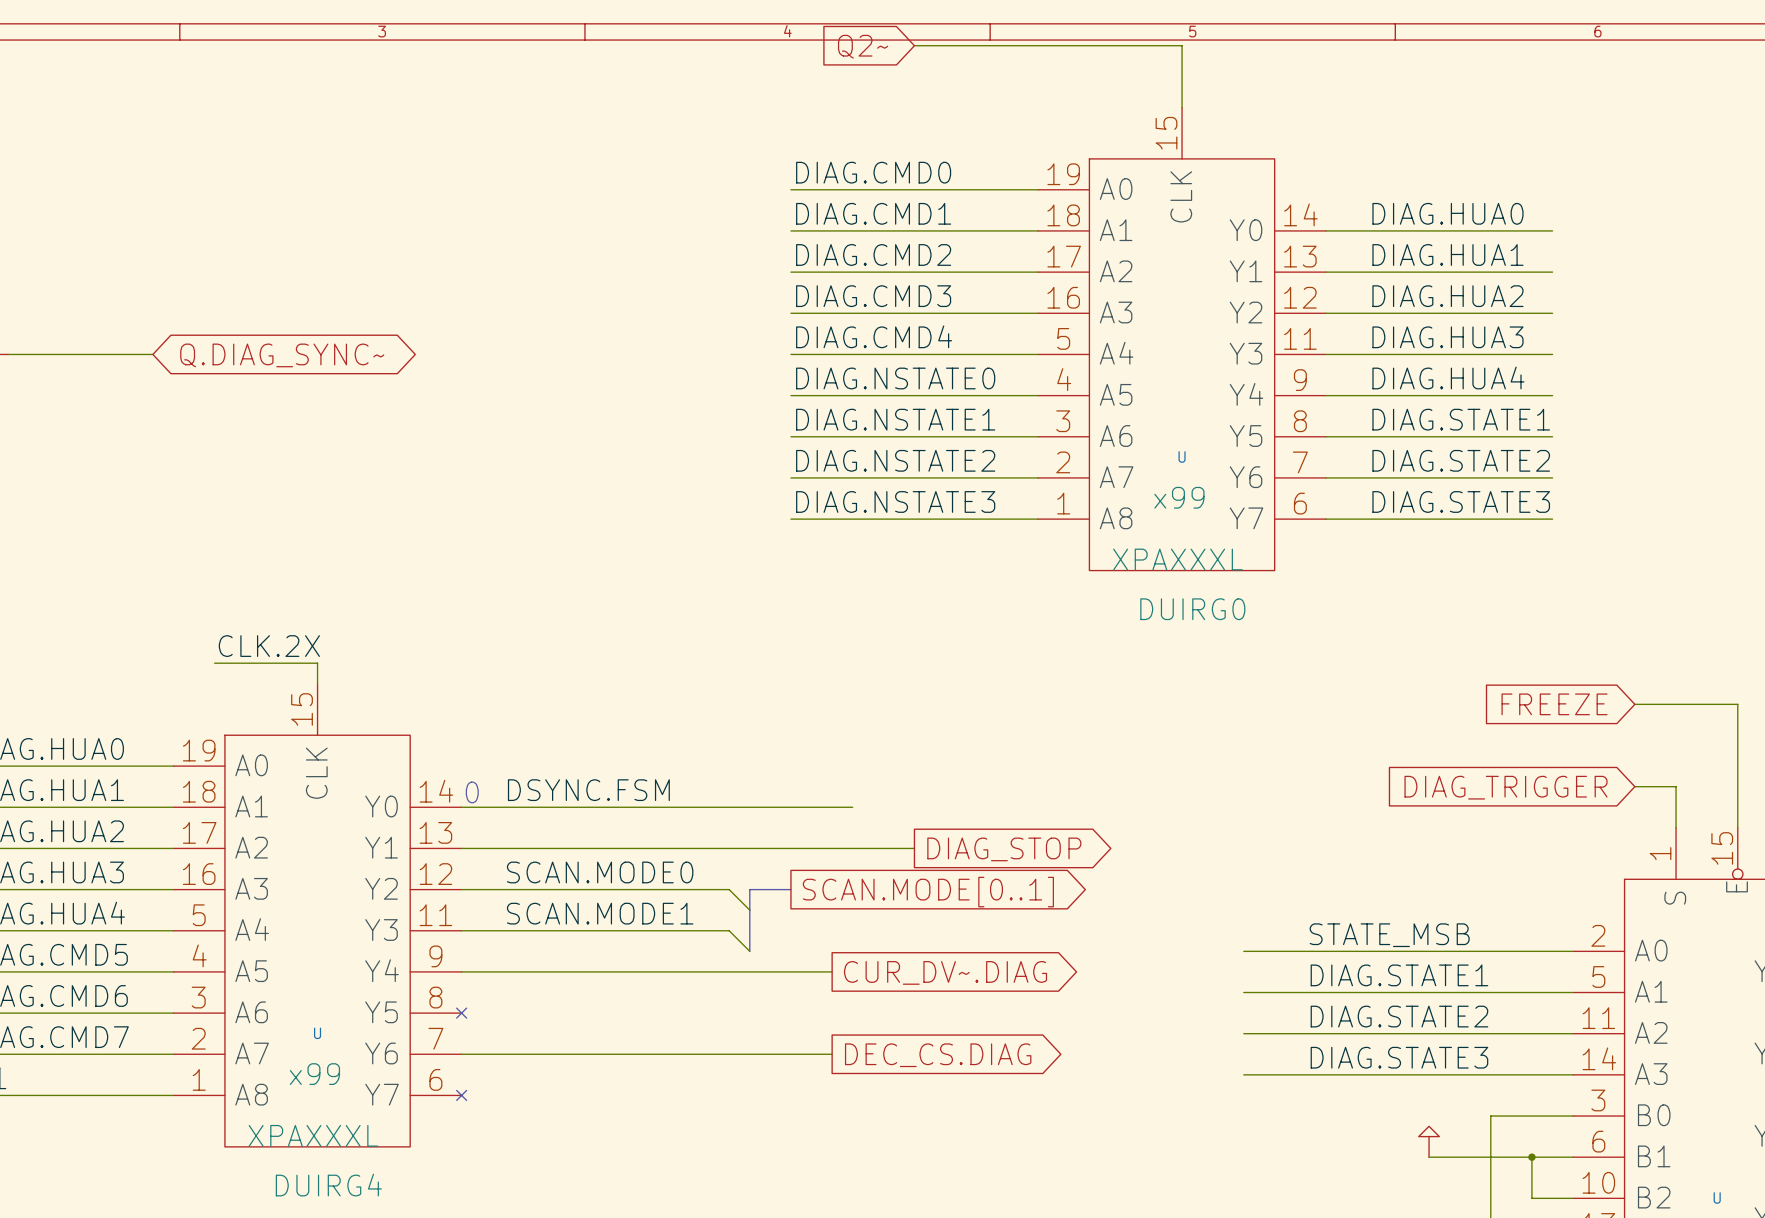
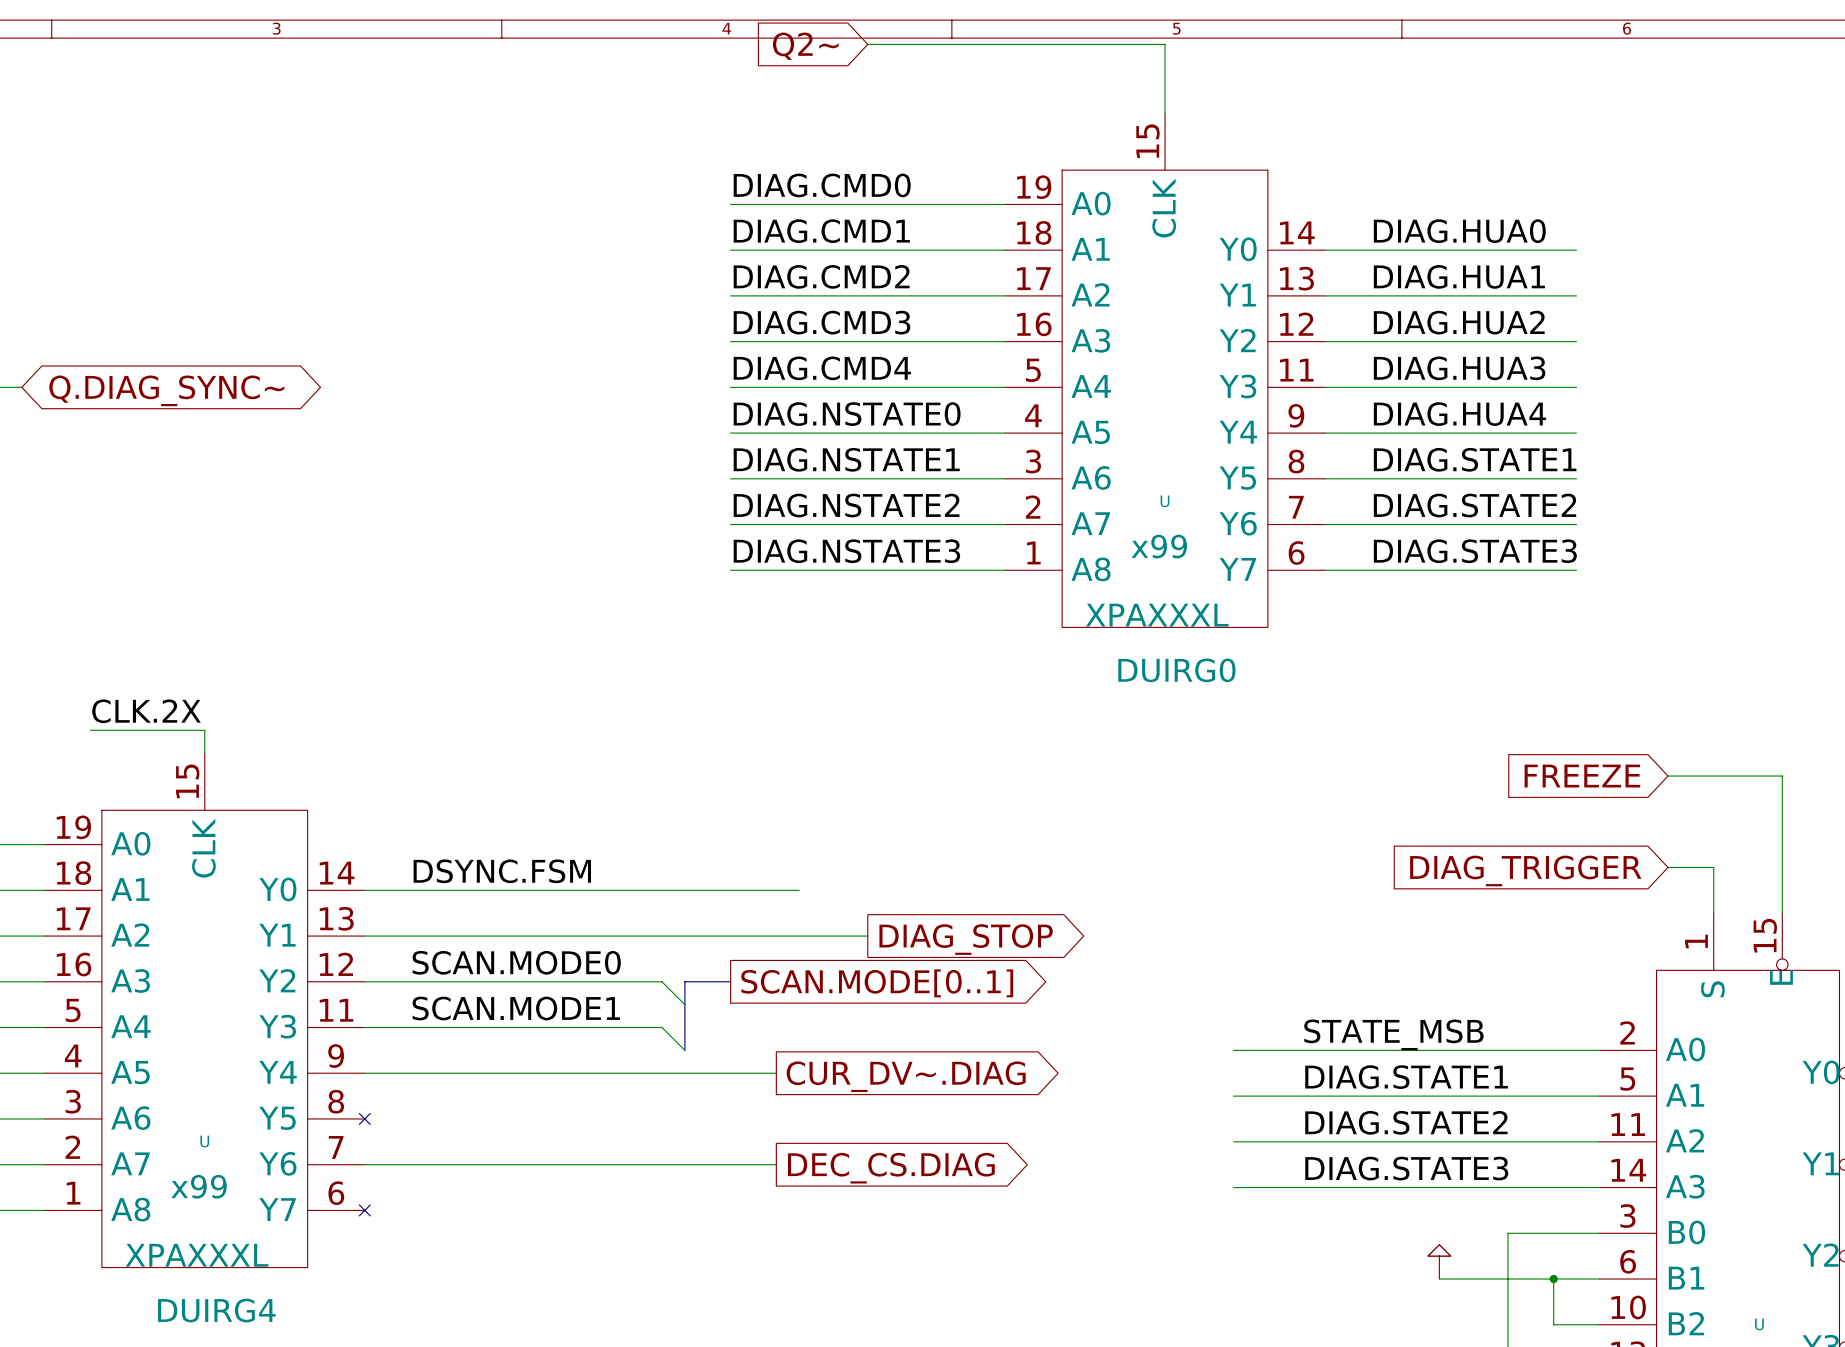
text: 0 (472, 792) -> none

